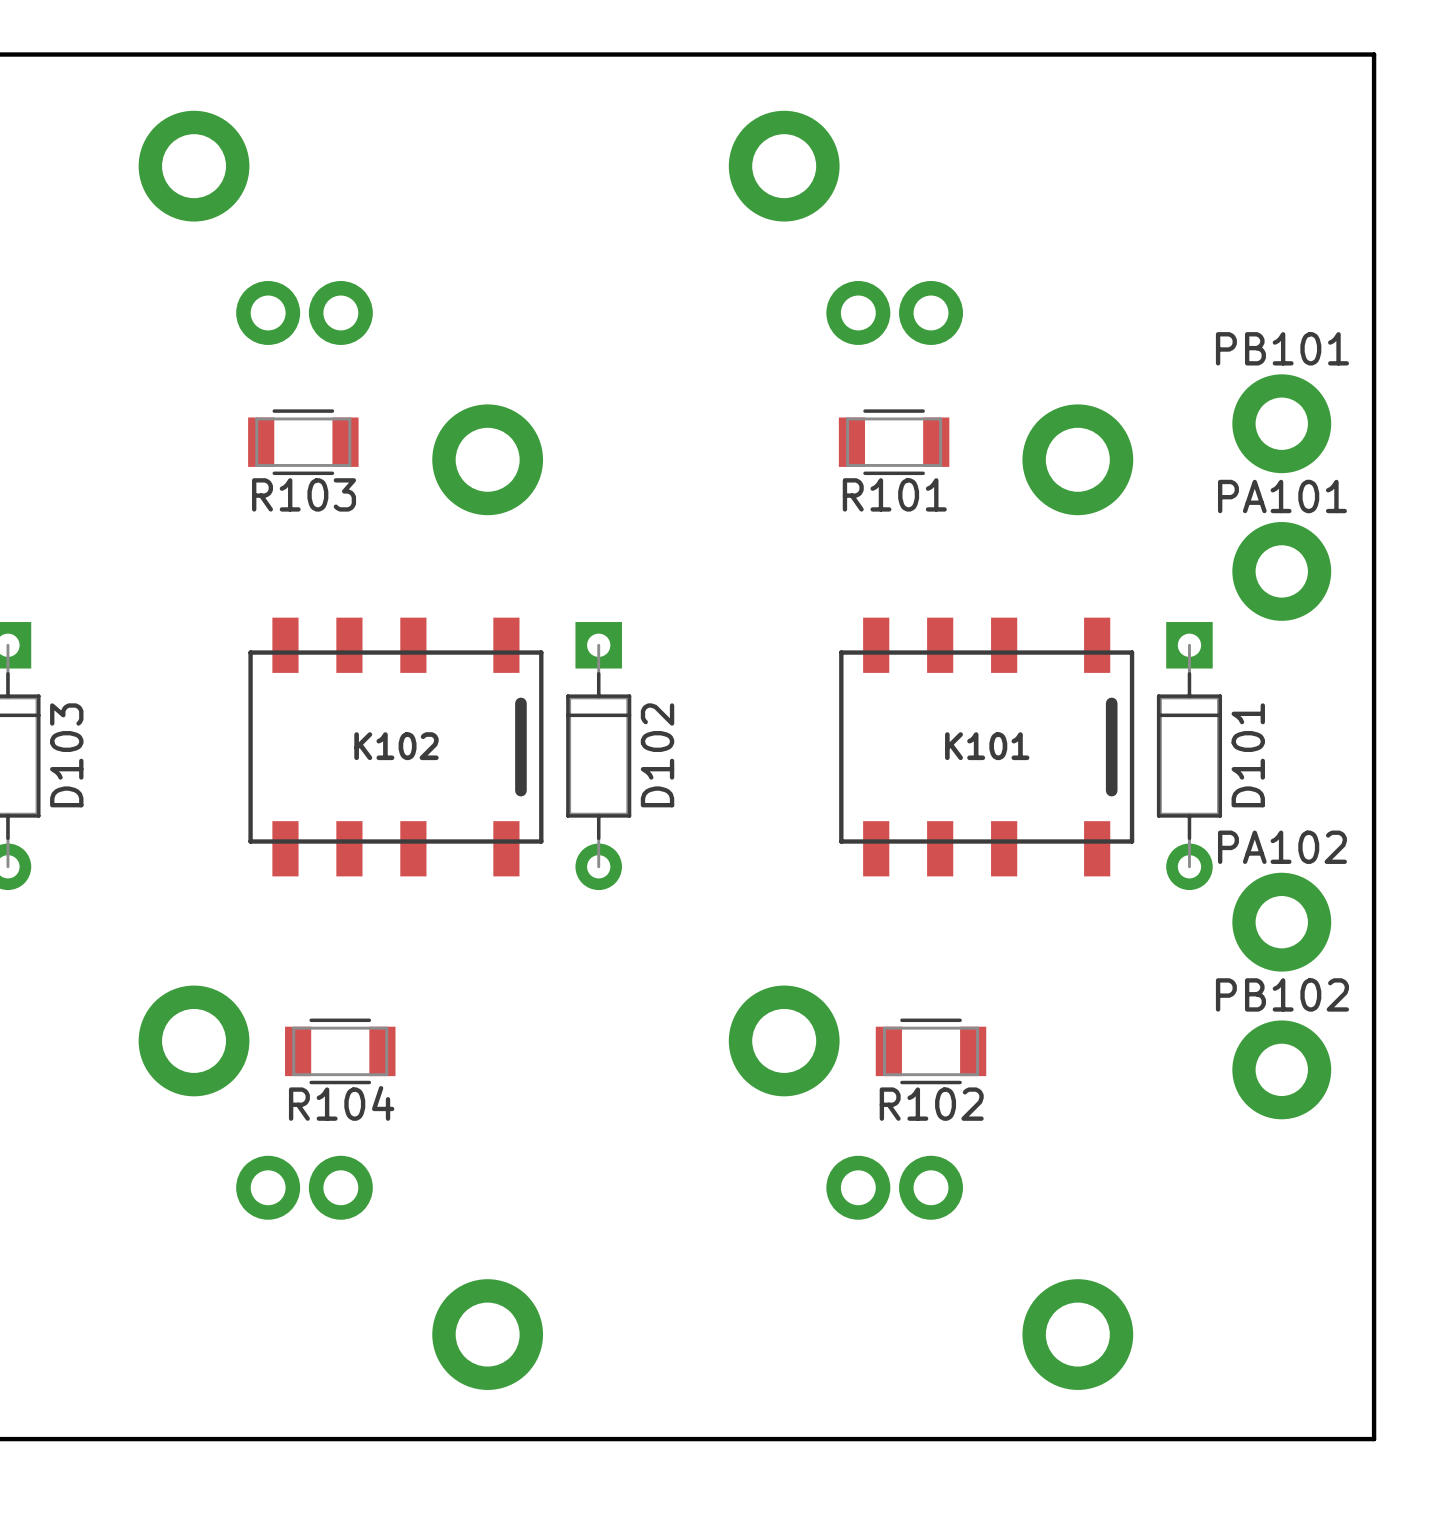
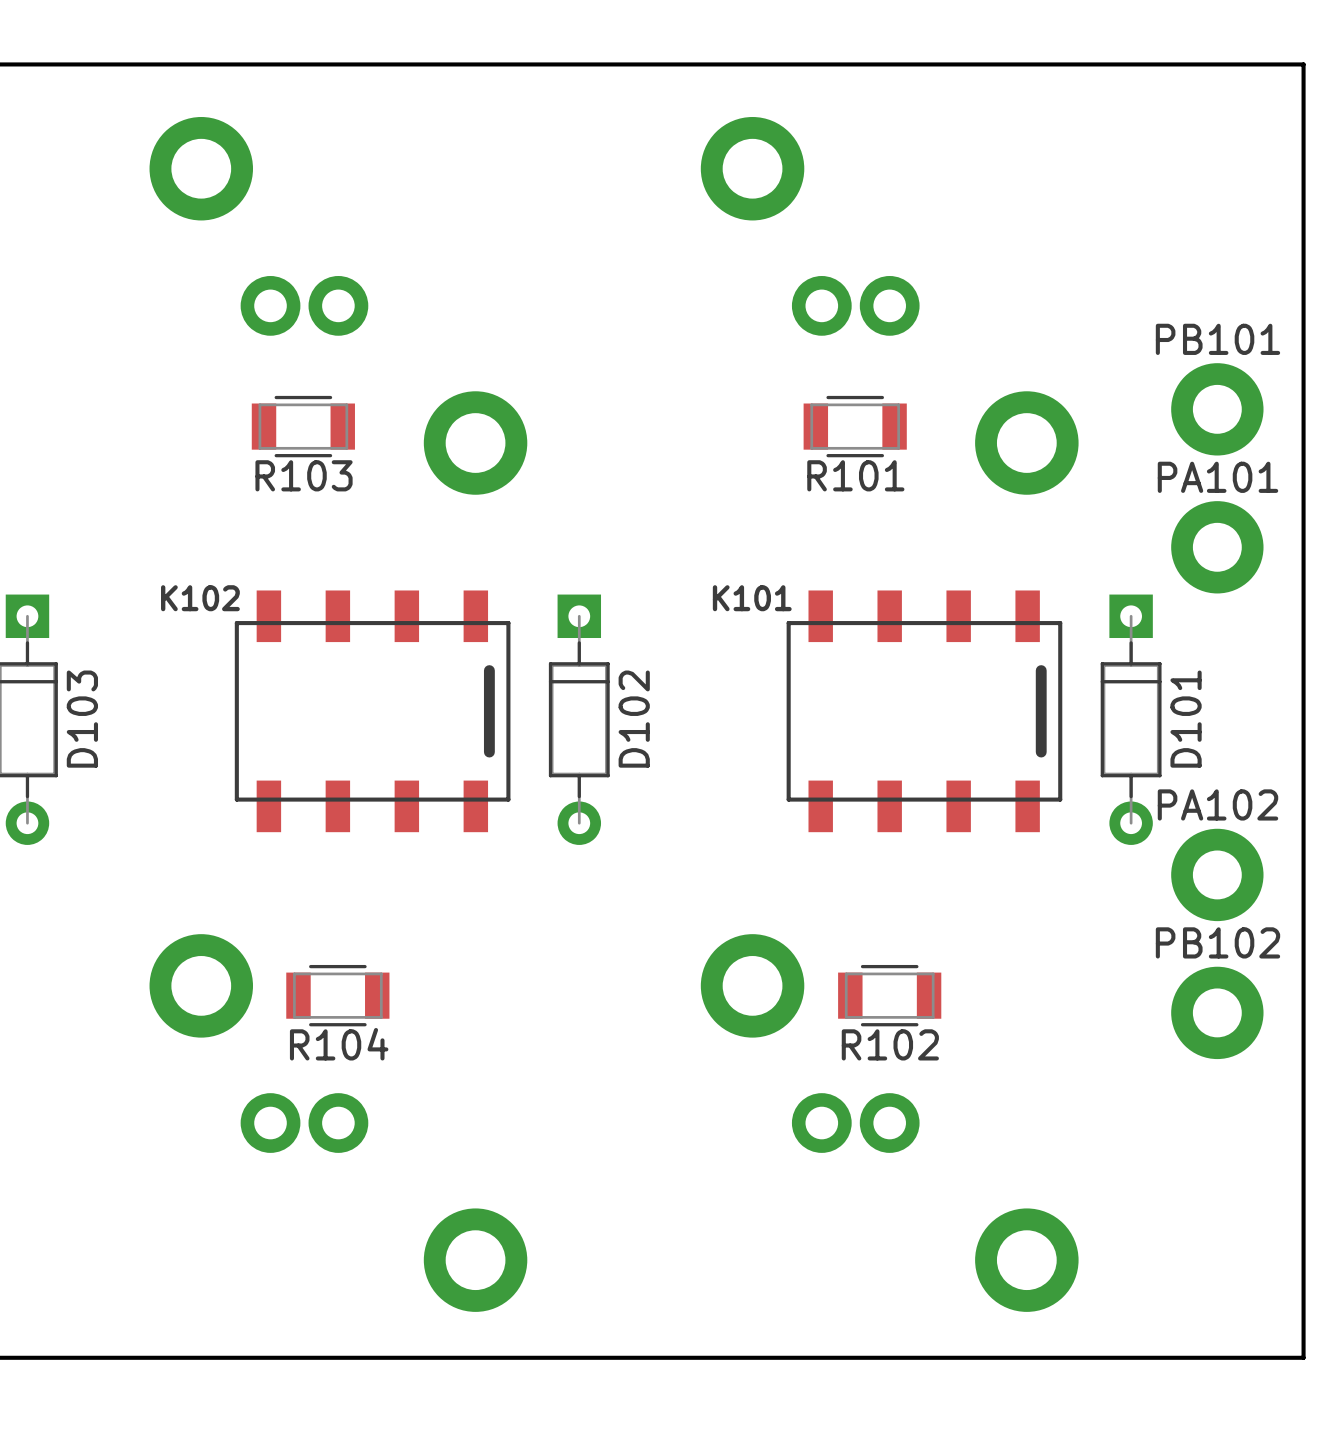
K102 footprint: [248, 617, 544, 877] -> [234, 590, 511, 833]
K101 footprint: [839, 617, 1135, 877] -> [786, 590, 1063, 833]
K102 name position: K102 (396, 746) -> K102 (200, 598)
K101 name position: K101 (987, 746) -> K101 (752, 598)

